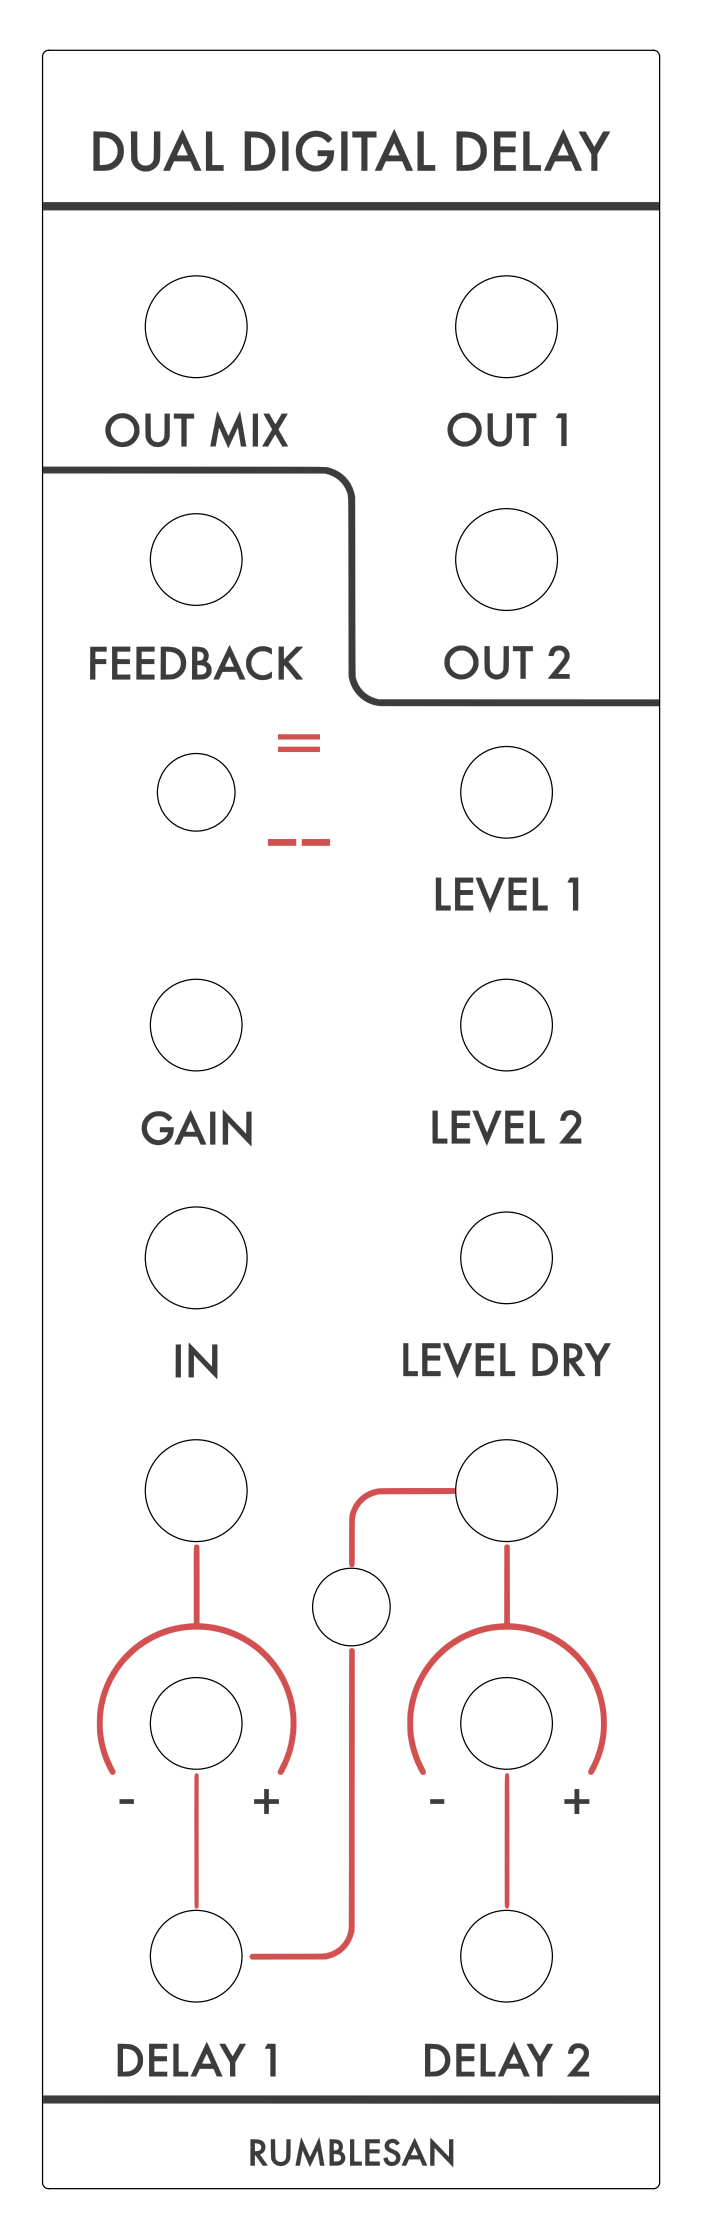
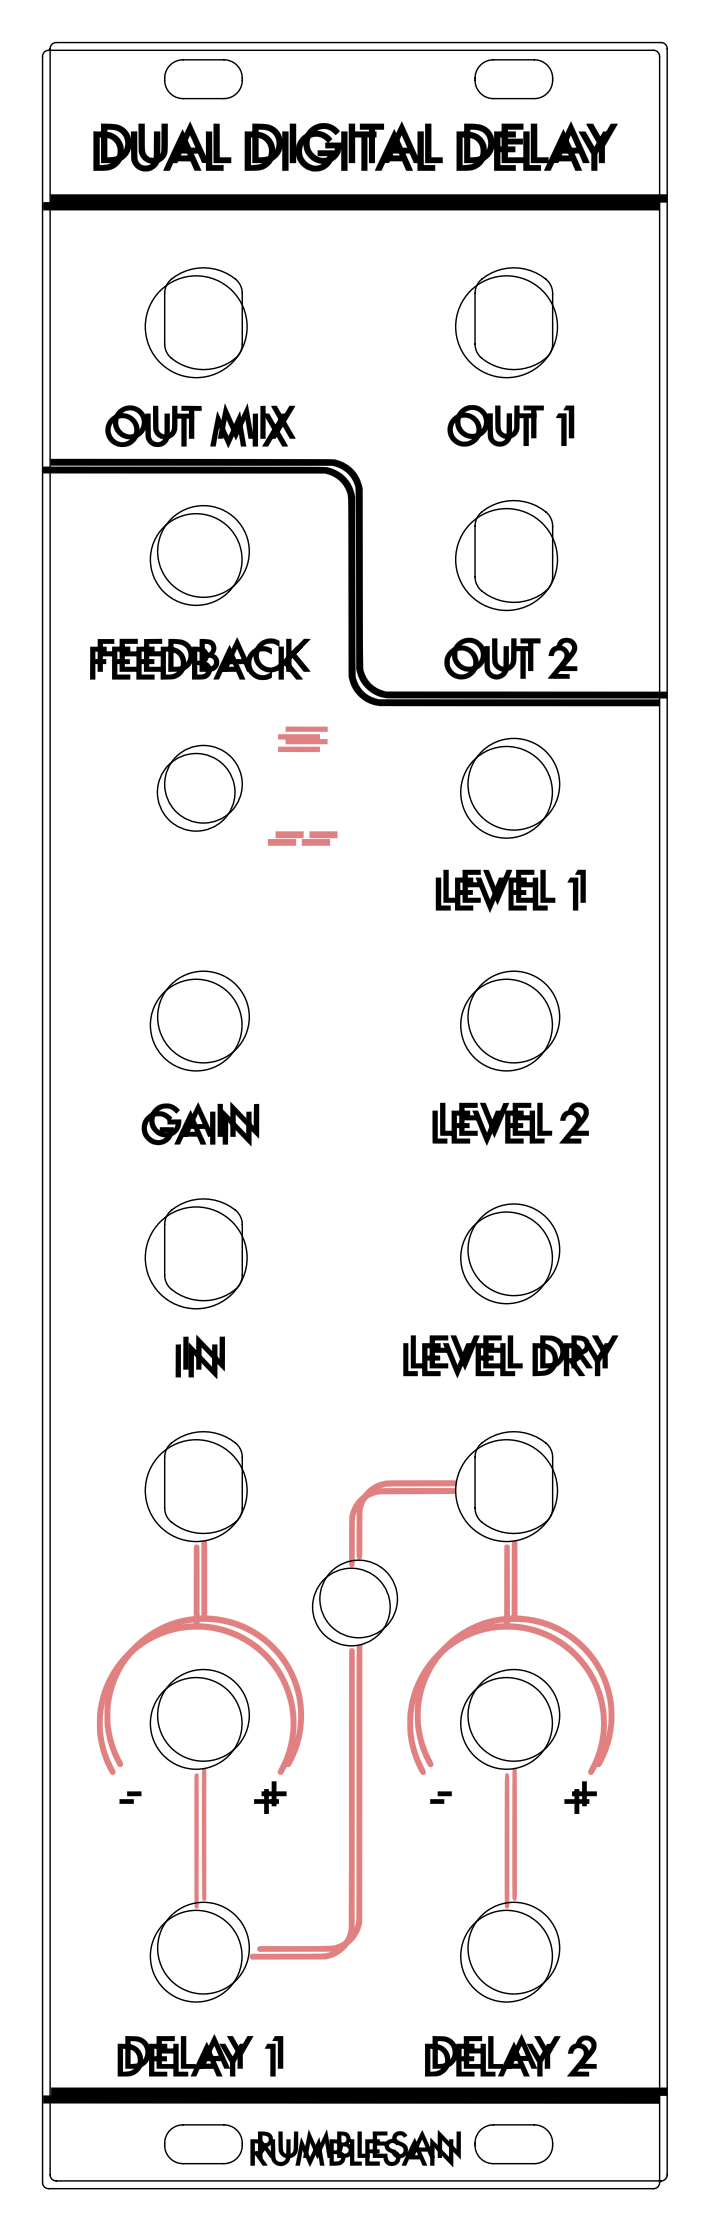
drawing: none -> [49, 41, 668, 2182]

